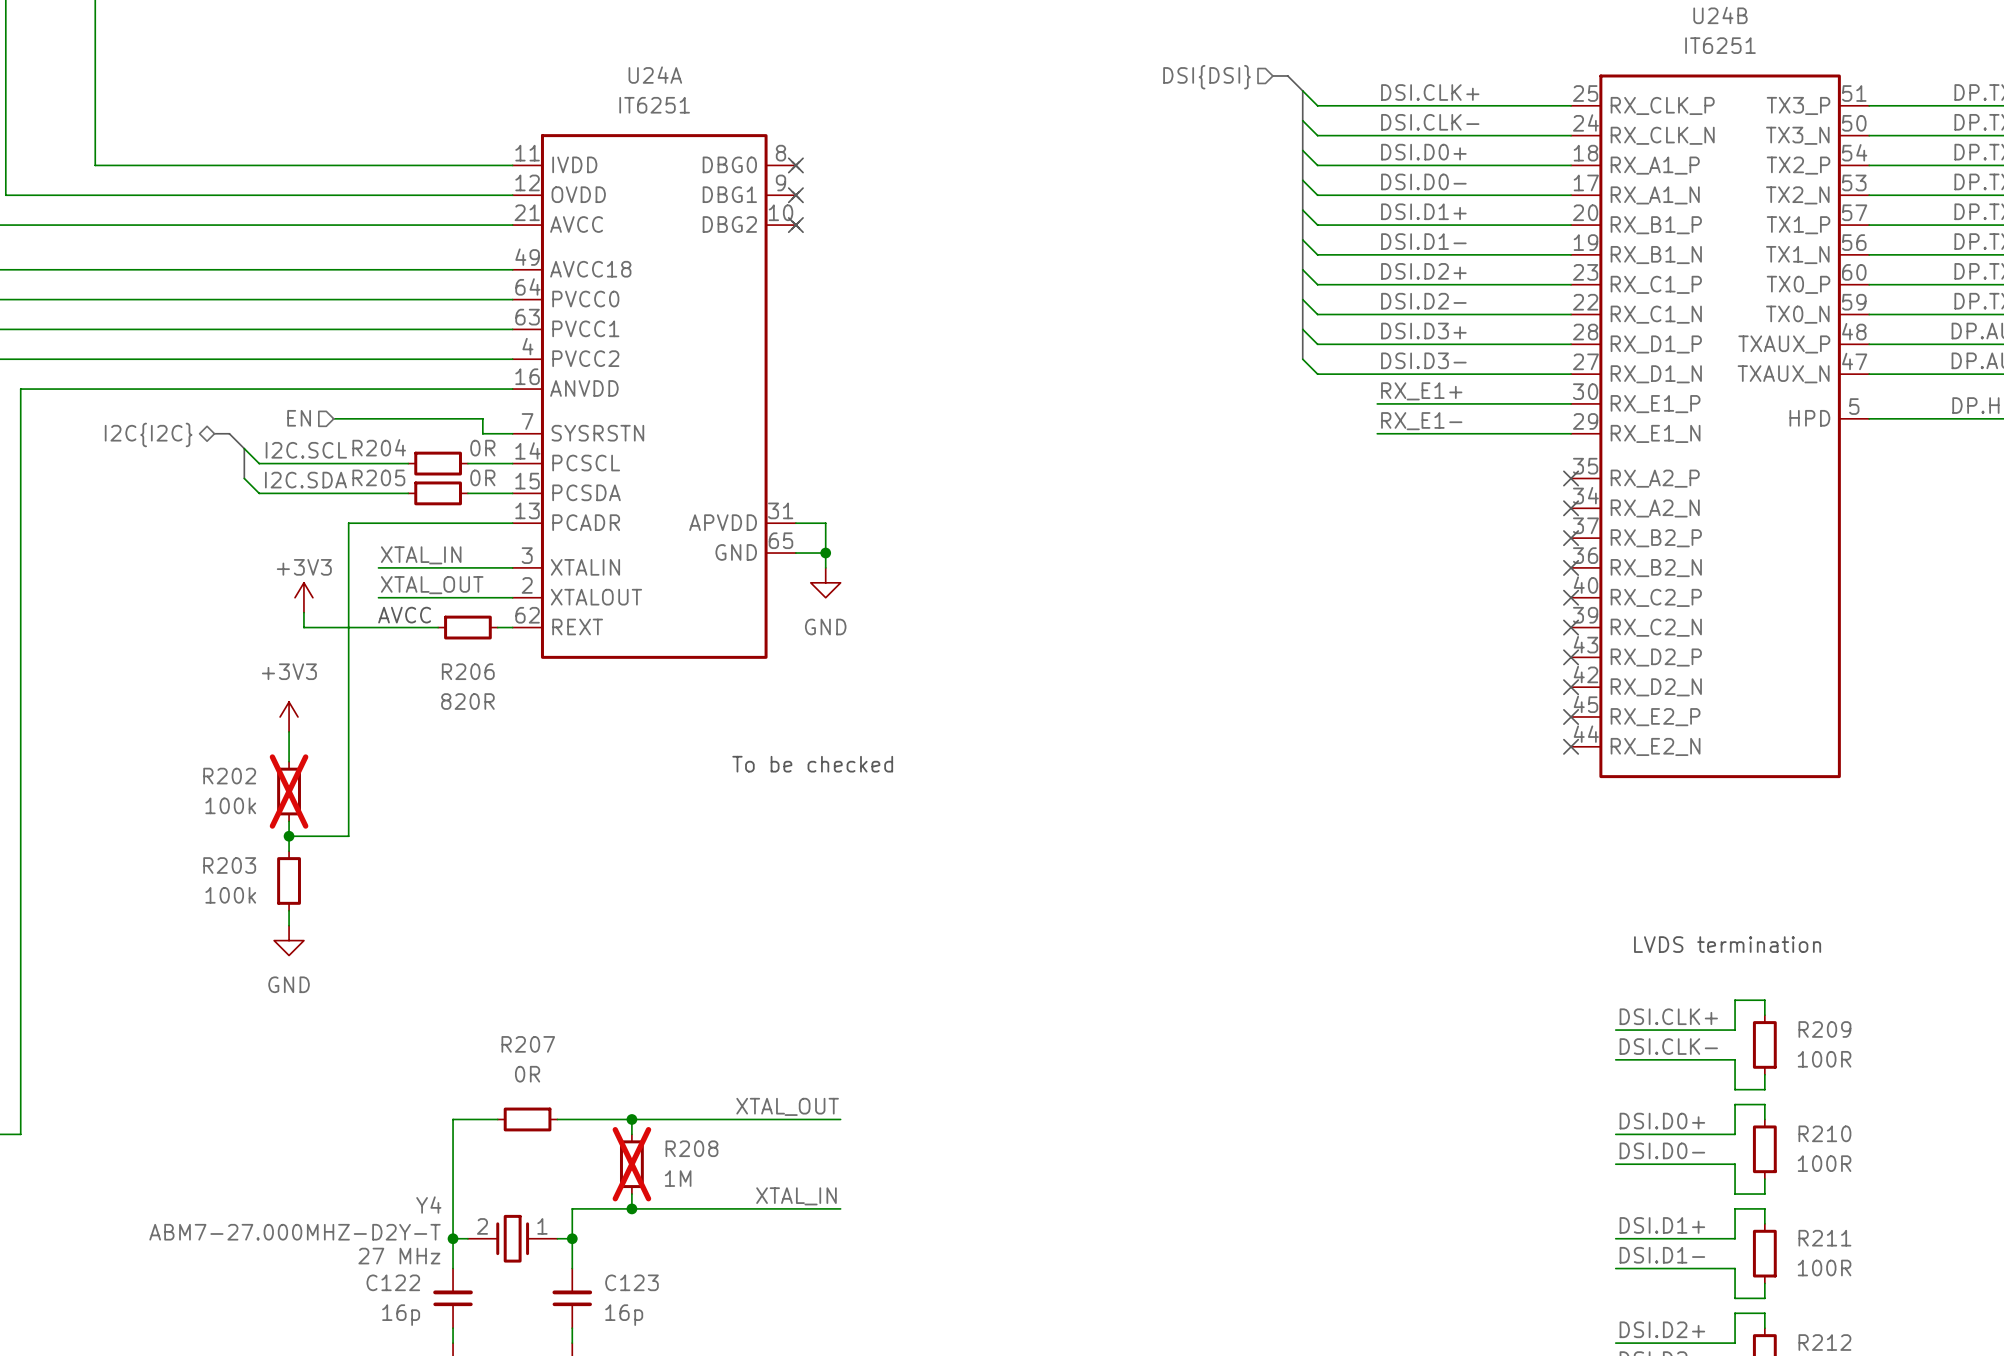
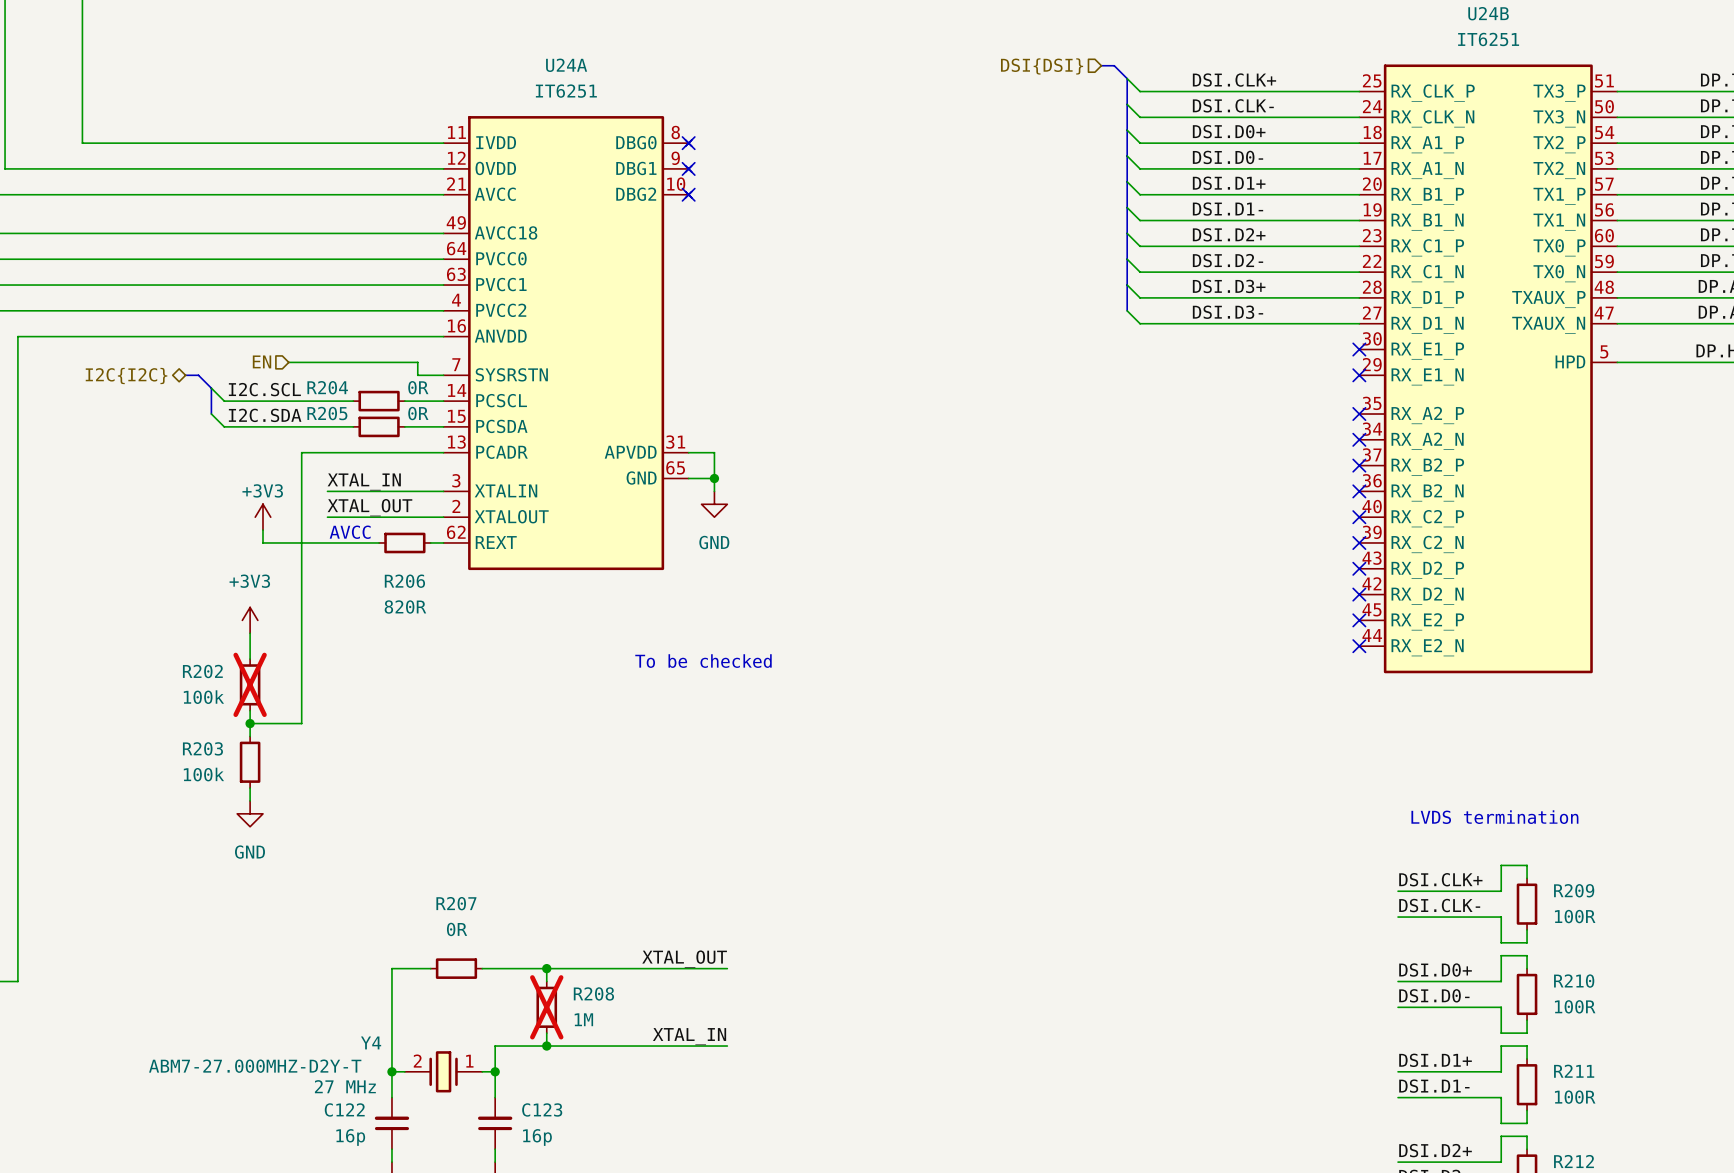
label: RX_E1+ (1421, 391) -> none
wire: (1377, 403) (1571, 403) -> none
no-connect mark: none -> (1359, 349)
label: RX_E1- (1421, 421) -> none
wire: (1377, 433) (1571, 433) -> none
no-connect mark: none -> (1359, 375)

